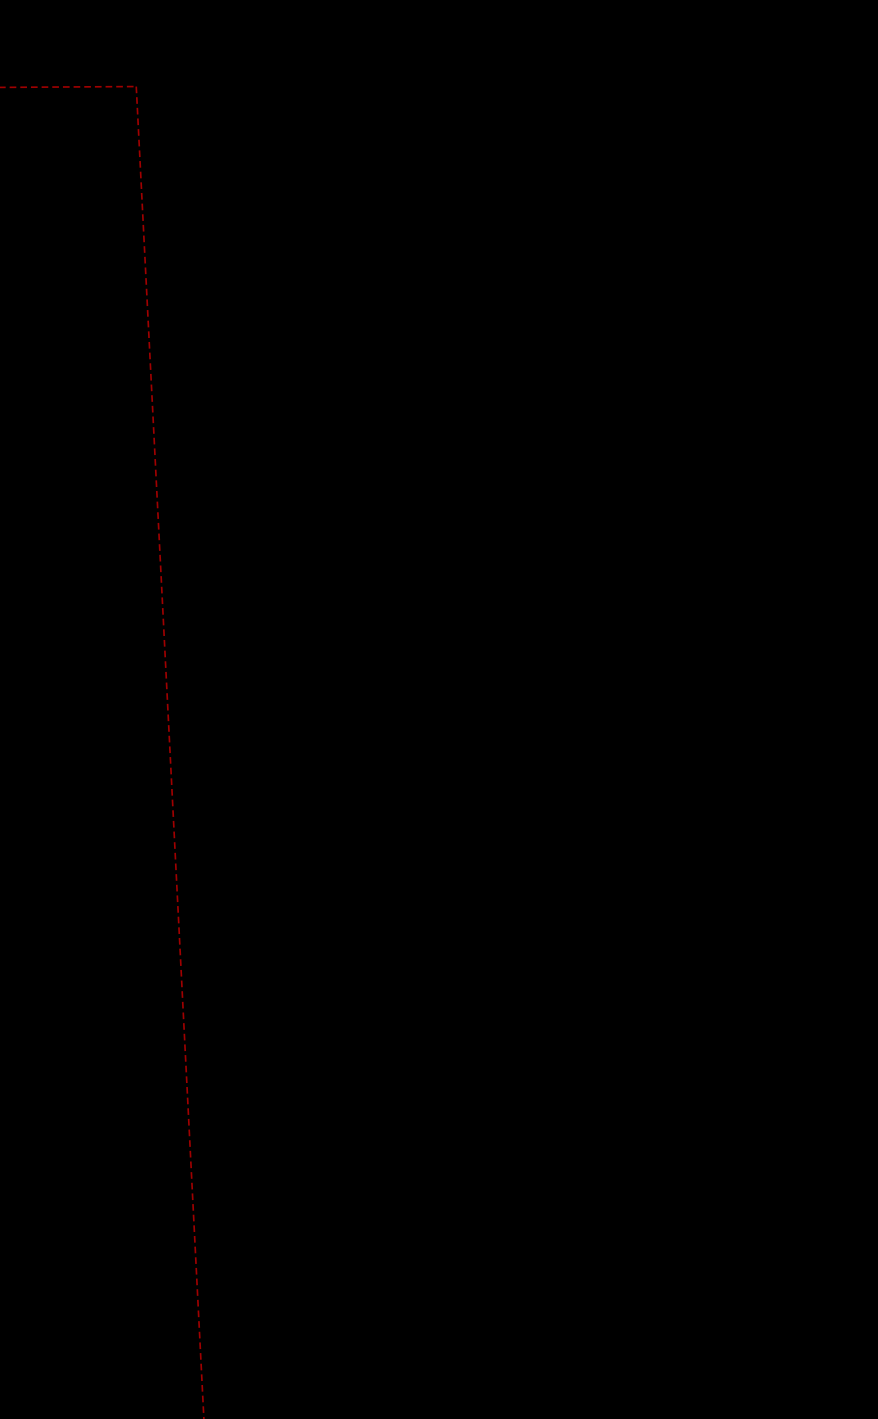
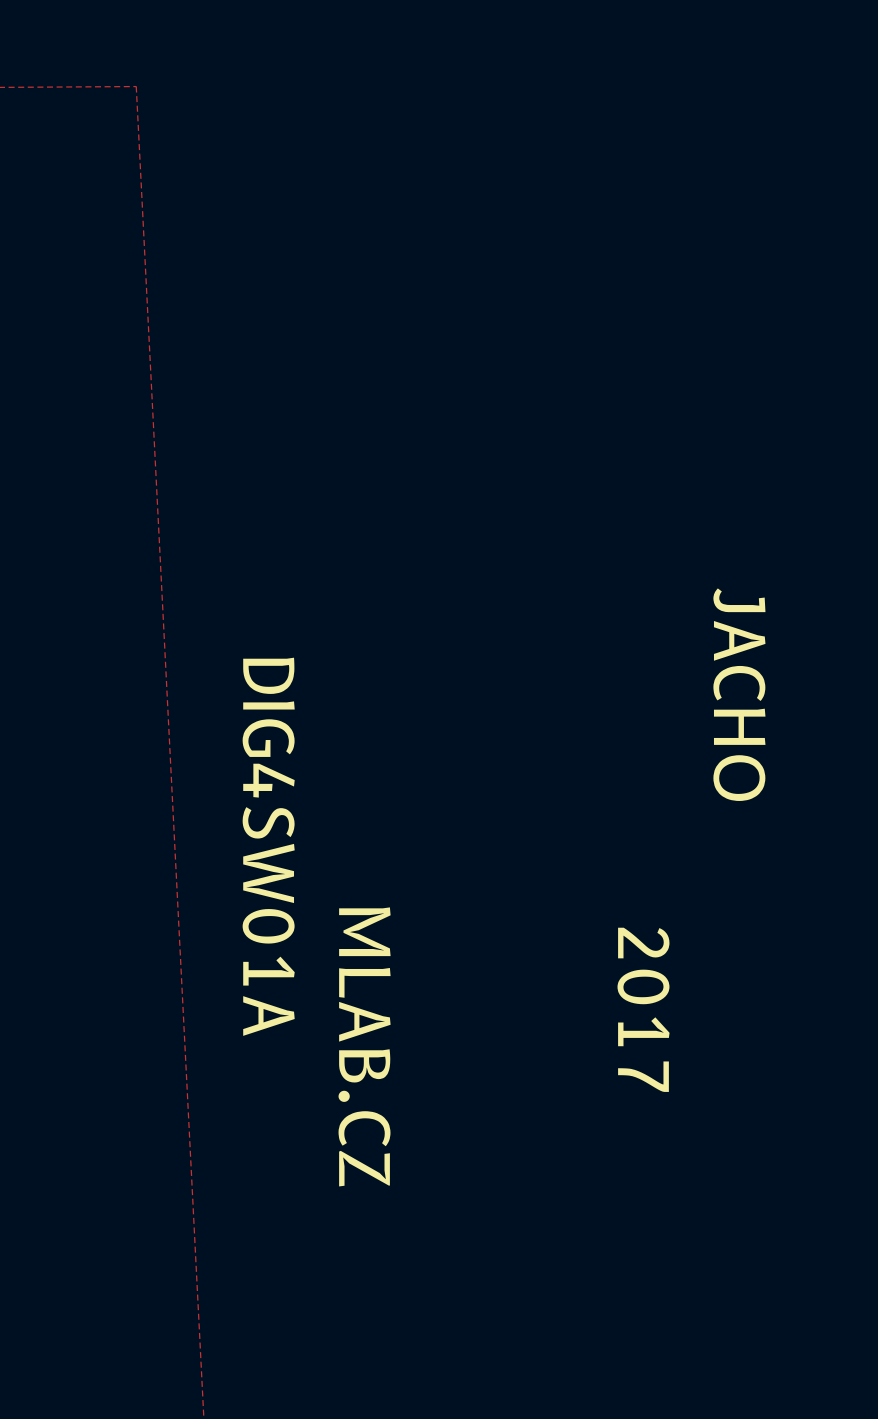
text: none -> JACHO (739, 694)
text: none -> DIG4SW01A (268, 846)
text: none -> 2017 (643, 1009)
text: none -> MLAB.CZ (364, 1046)

